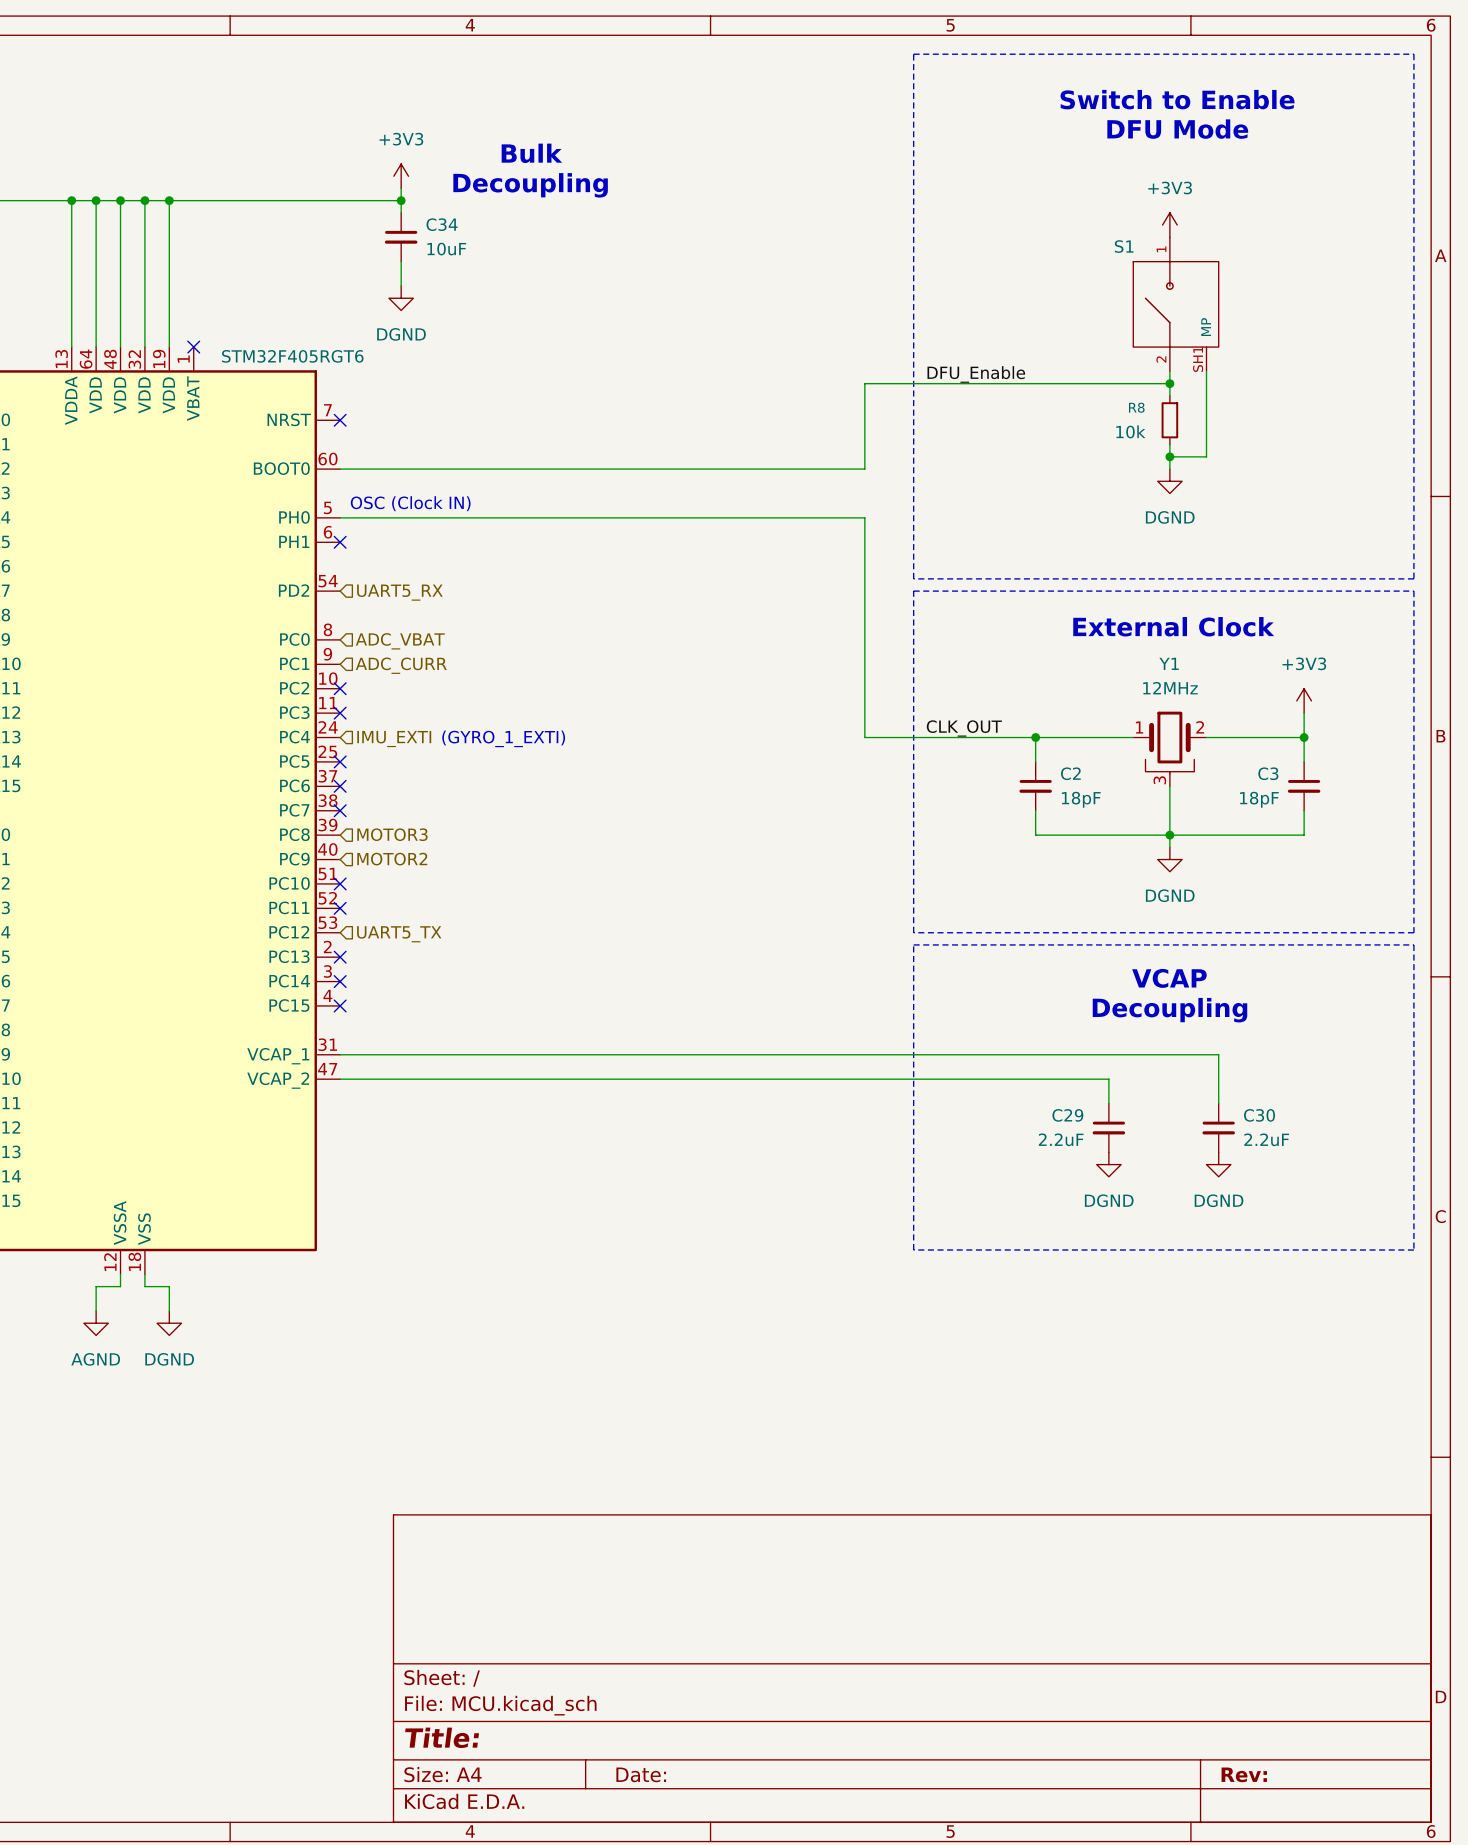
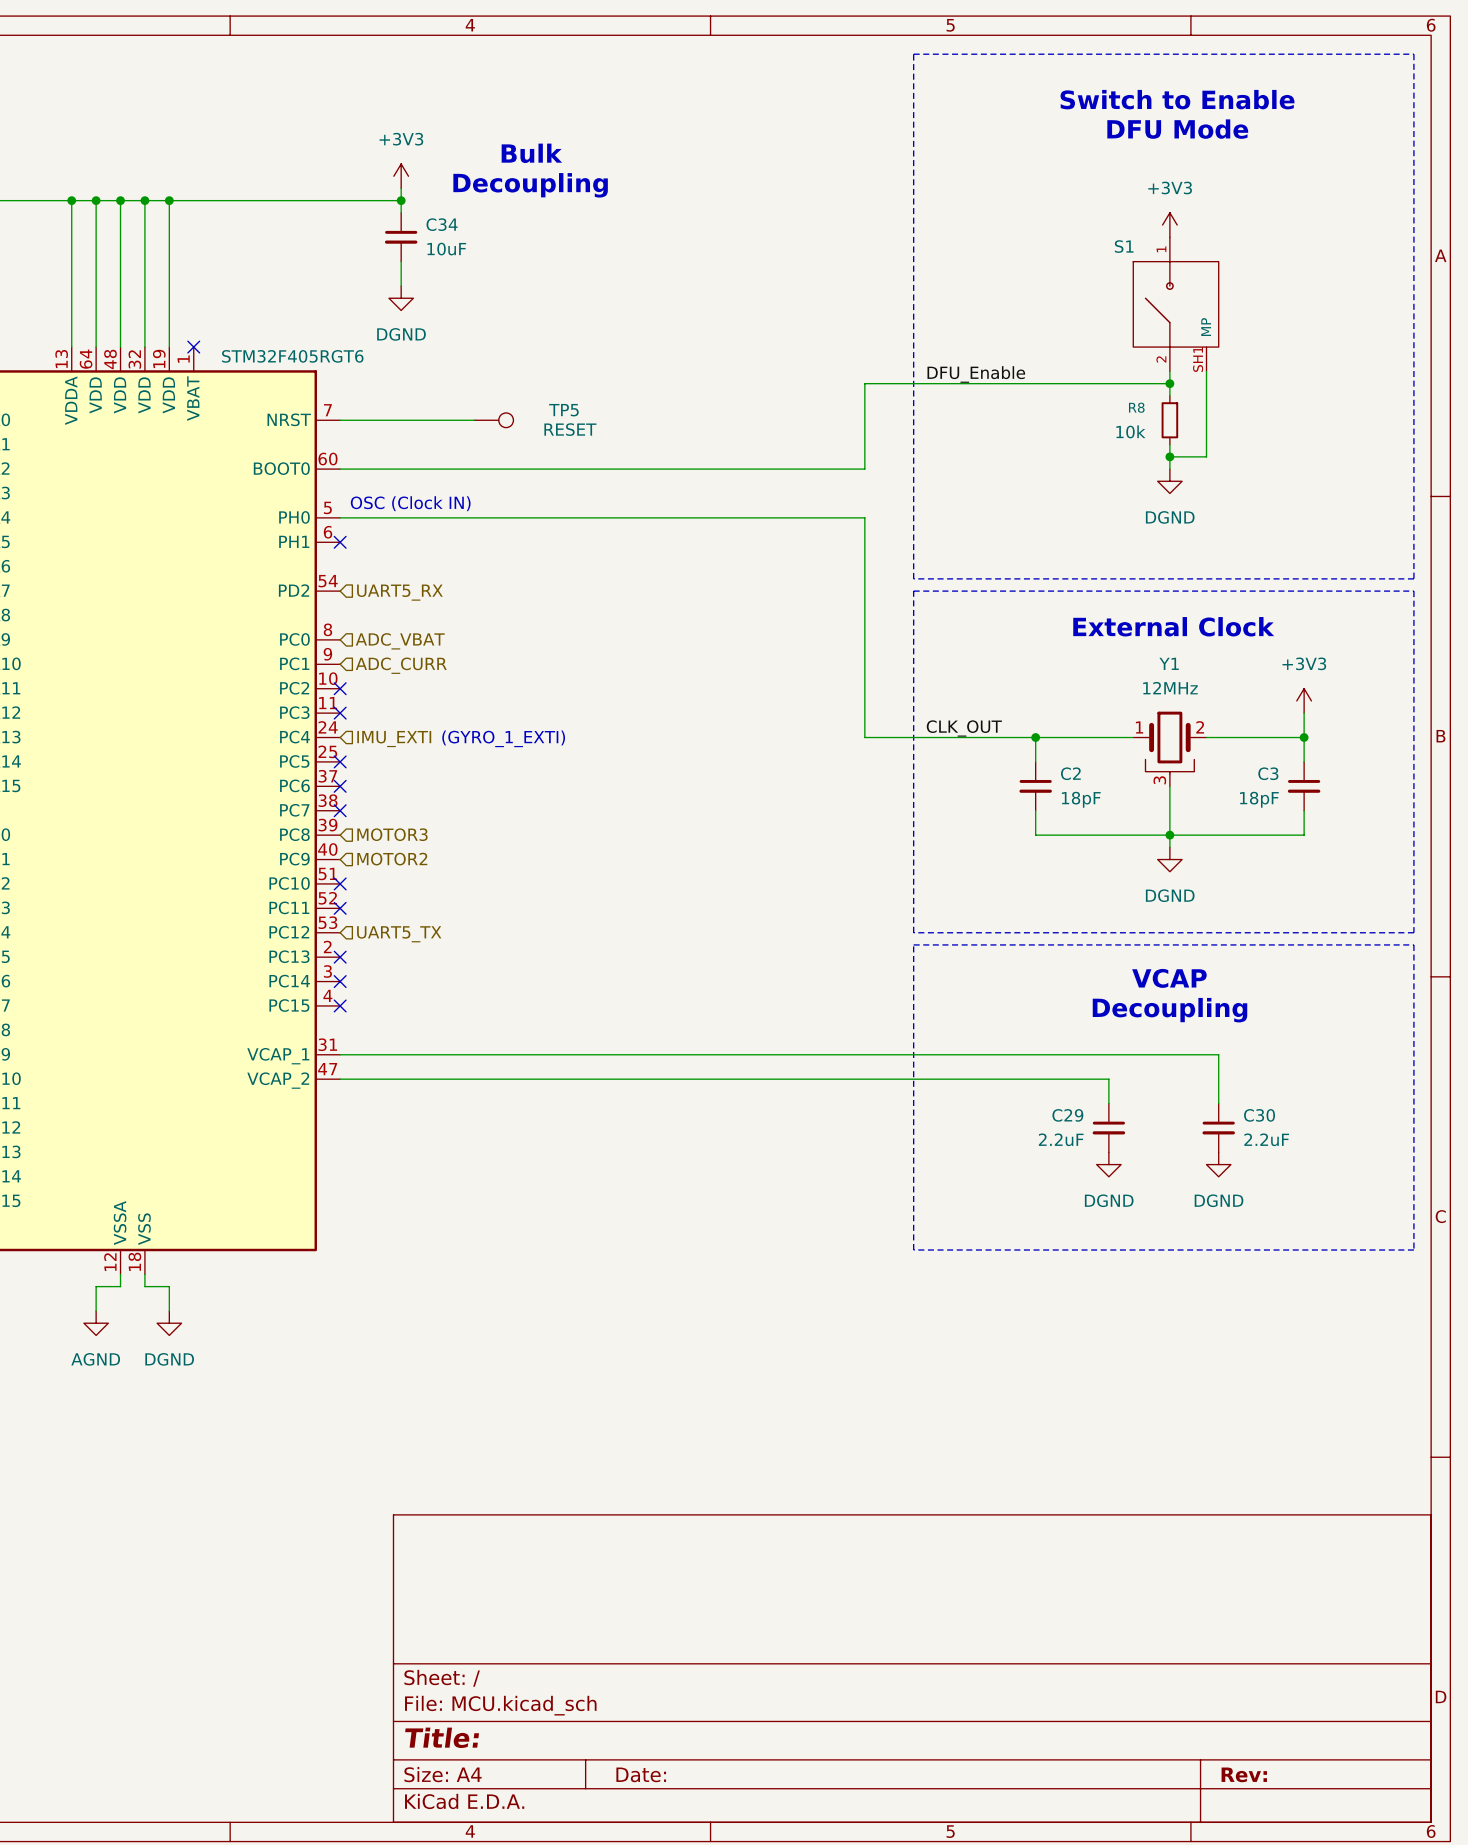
wire: none -> (340, 420) (474, 420)
no-connect mark: (340, 420) -> none
TP5: none -> RESET (493, 420)

